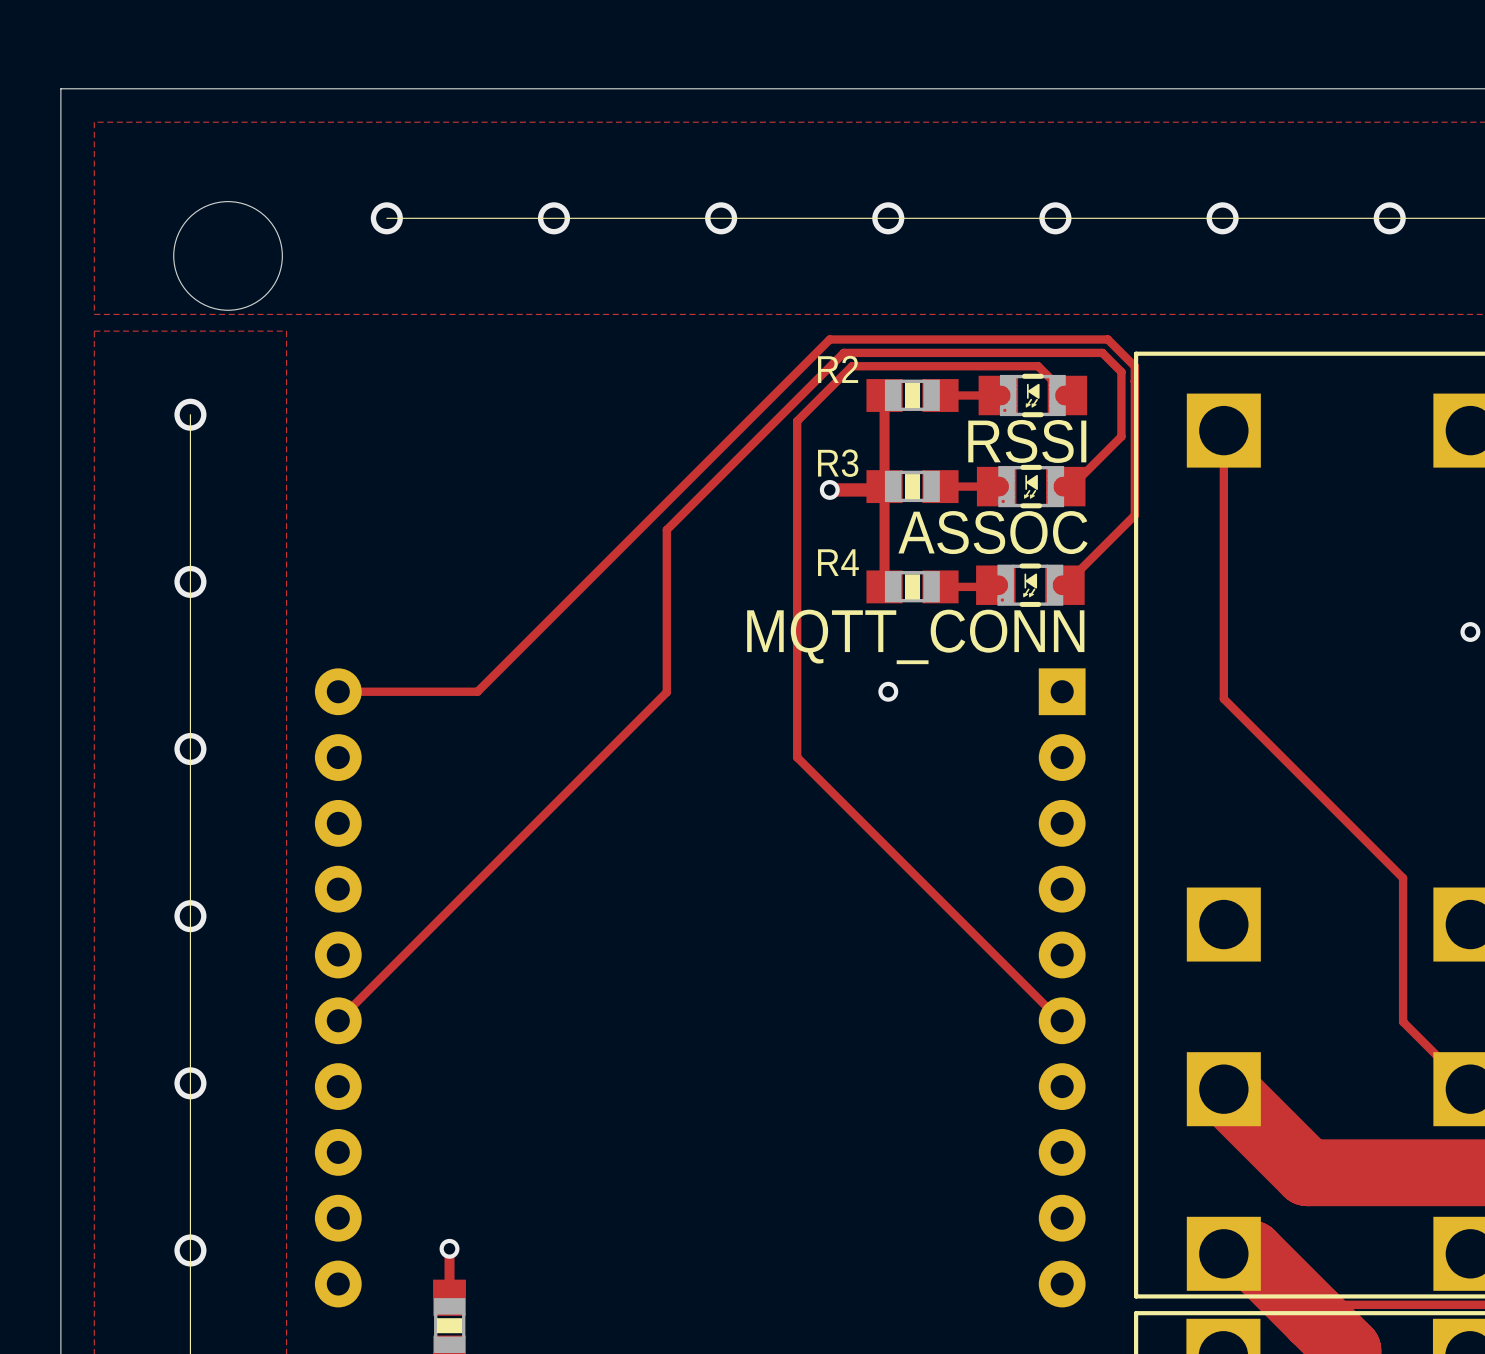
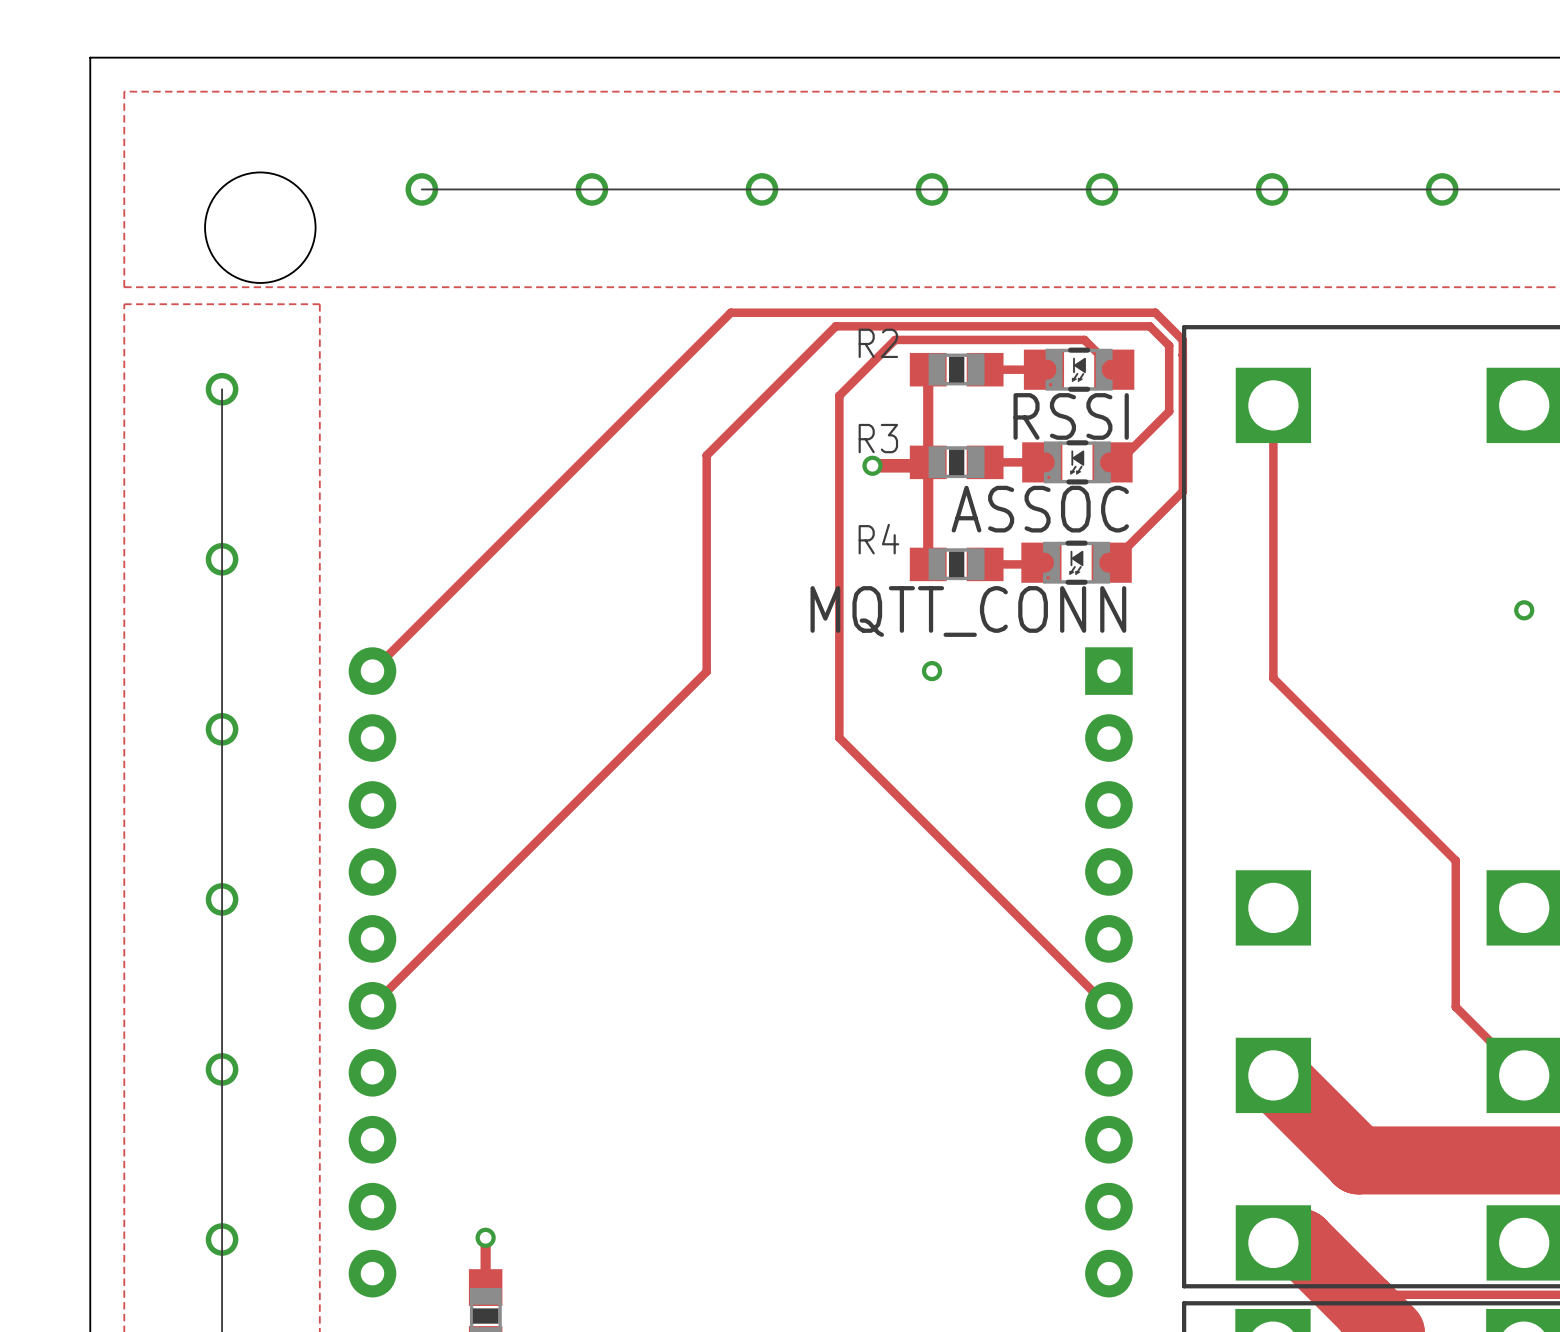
track: (829, 339) (477, 691) (338, 691) -> (872, 312) (730, 312) (372, 671)
track: (843, 352) (666, 529) -> (886, 326) (835, 326) (706, 455) (706, 506)

